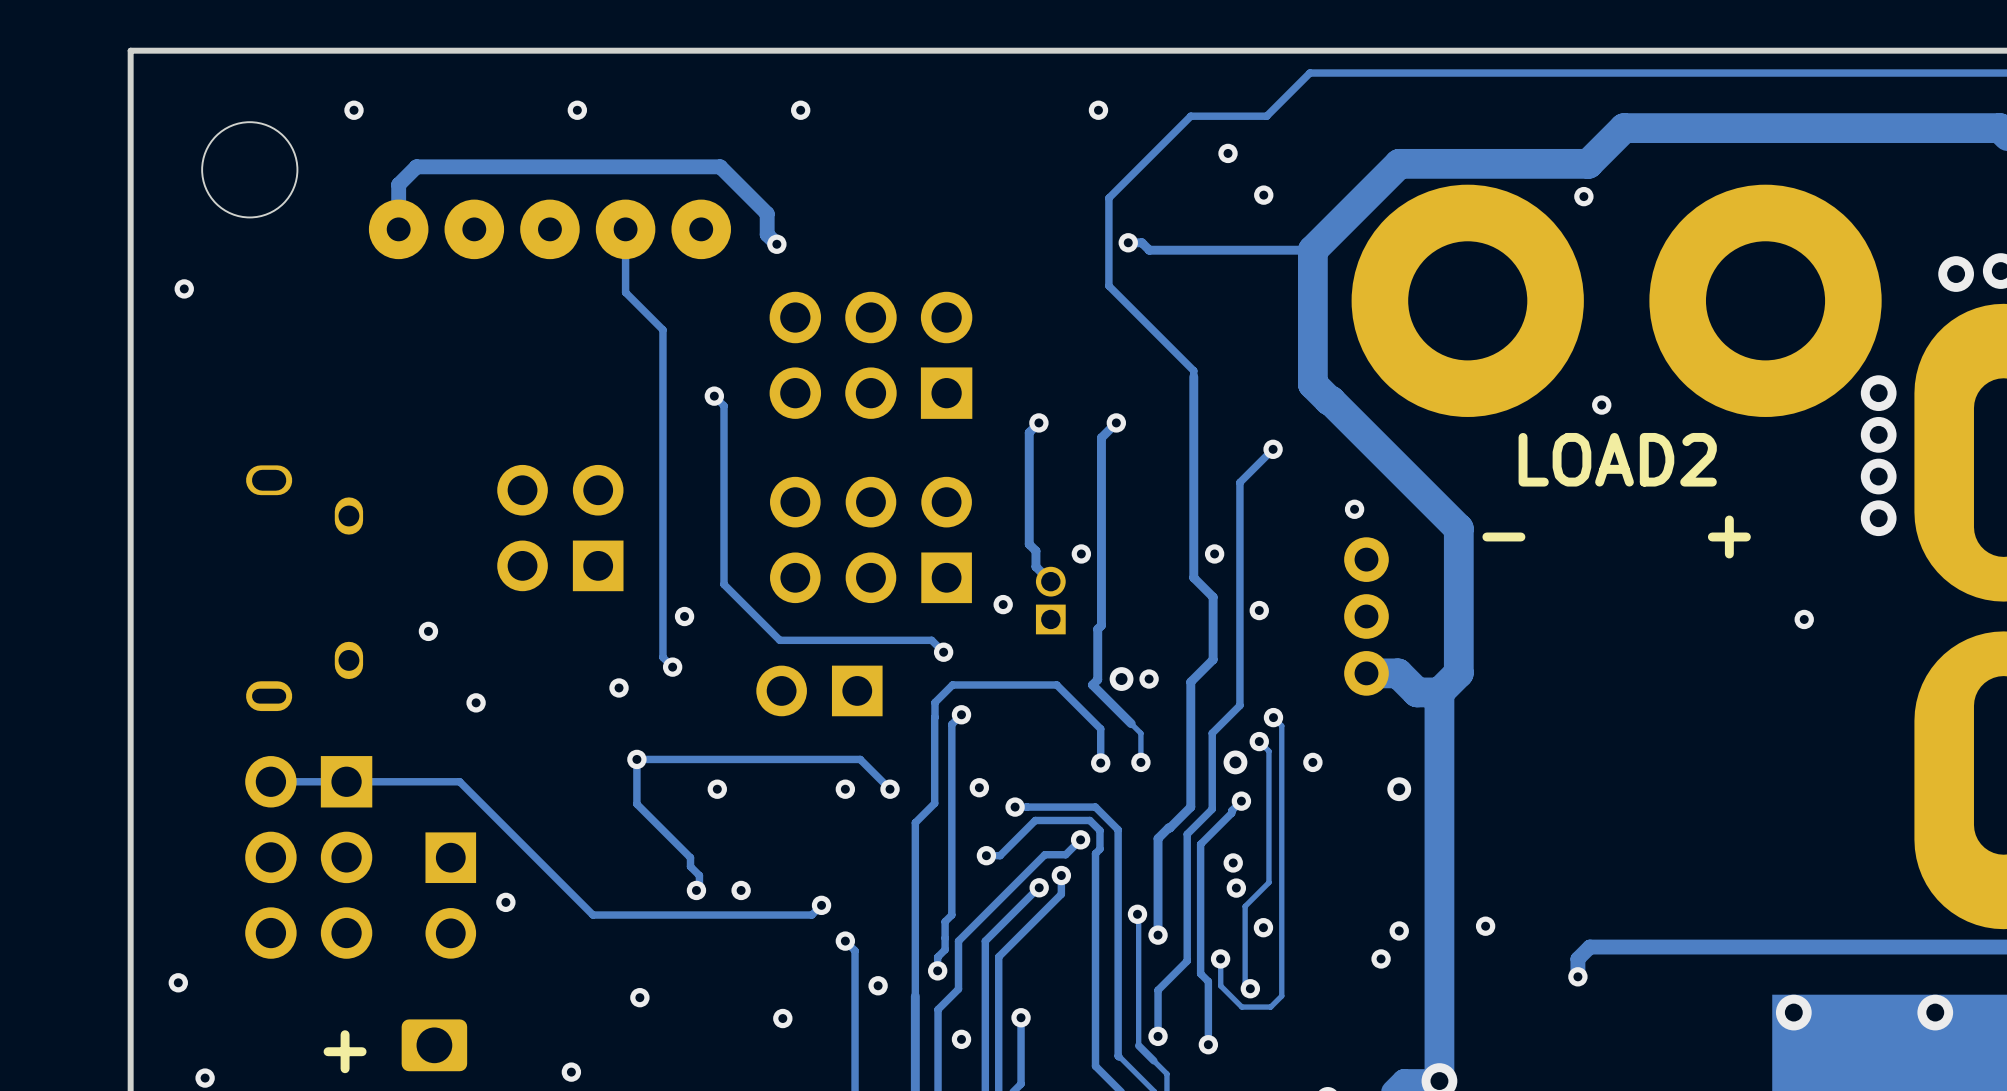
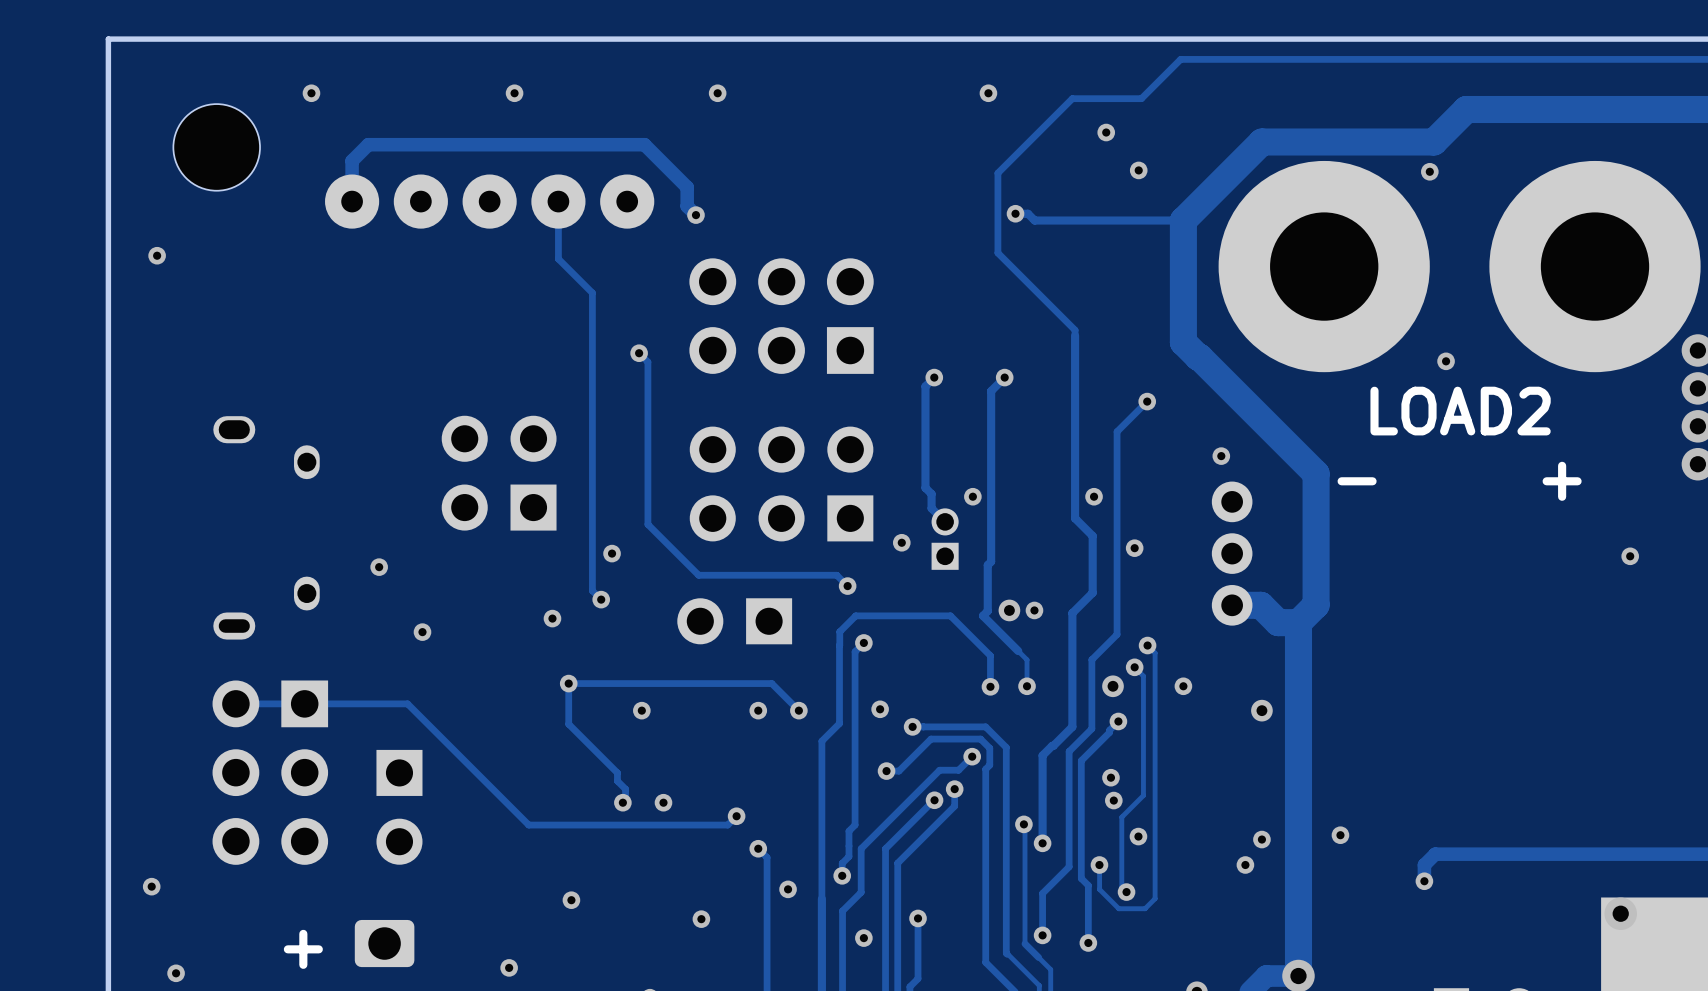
via: (505, 902) -> none

